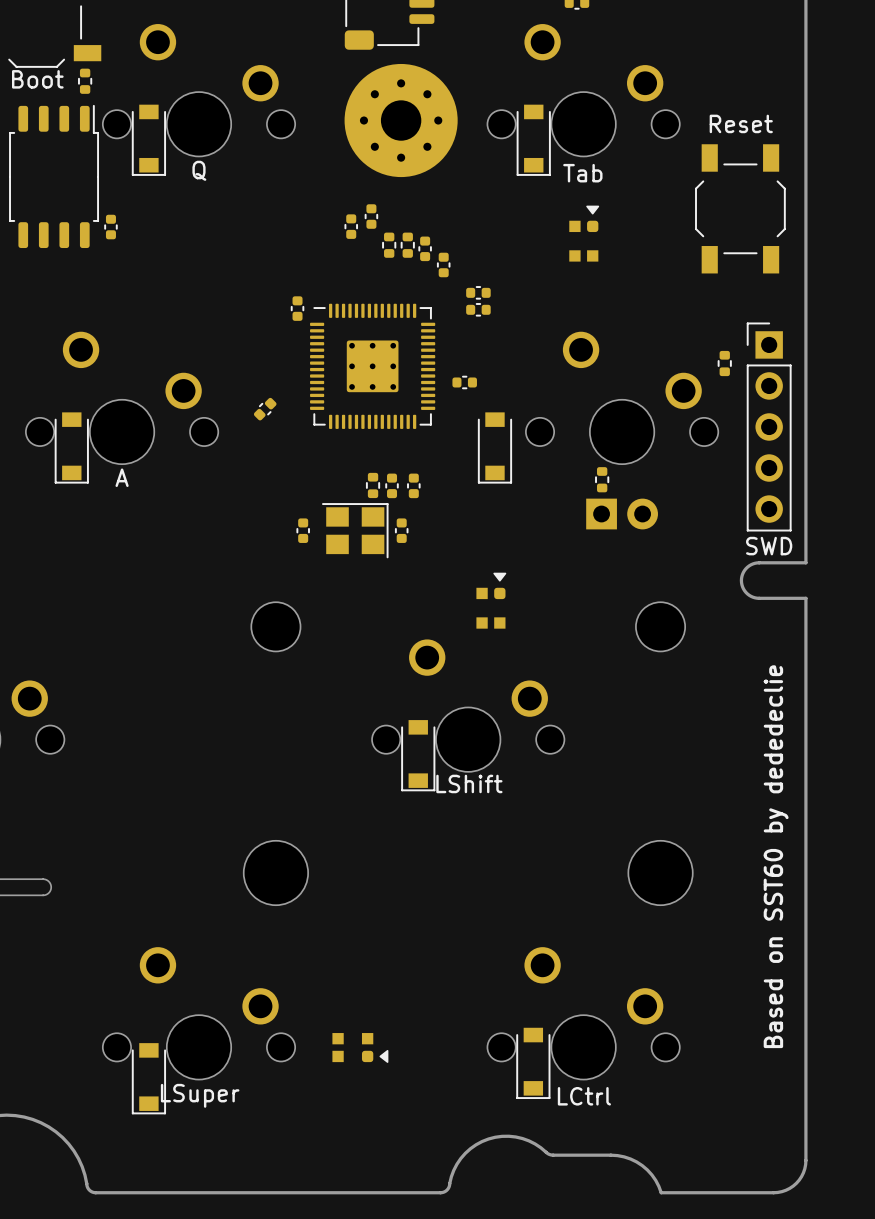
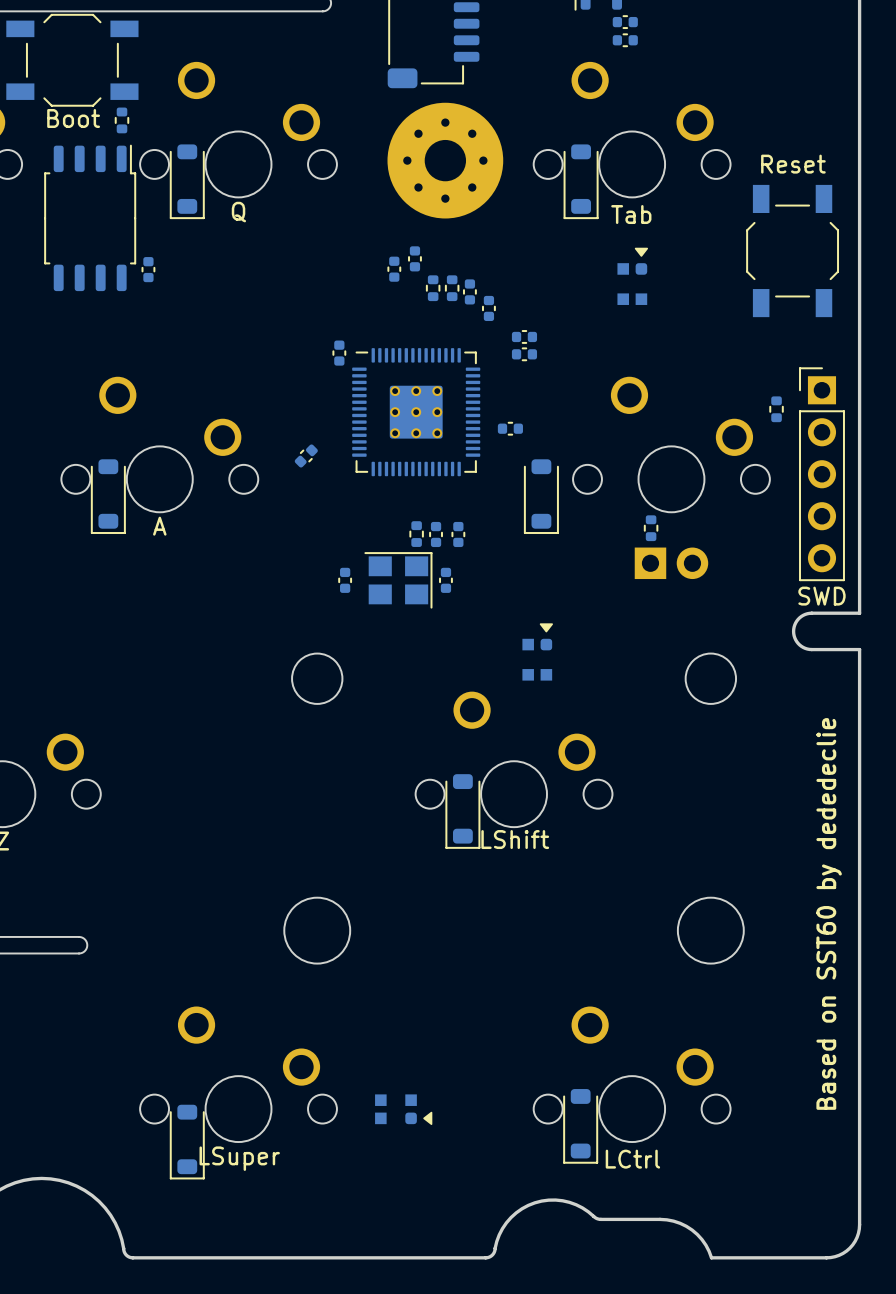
part footprint: [131, 104, 167, 176] -> [169, 144, 205, 220]
part footprint: [516, 104, 551, 176] -> [563, 144, 599, 220]
part footprint: [54, 412, 89, 484] -> [90, 459, 126, 534]
part footprint: [477, 412, 513, 484] -> [523, 459, 559, 534]
part footprint: [401, 720, 436, 792] -> [445, 774, 481, 849]
part footprint: [516, 1027, 551, 1100] -> [563, 1089, 599, 1164]
part footprint: [131, 1043, 167, 1115] -> [169, 1104, 205, 1180]

